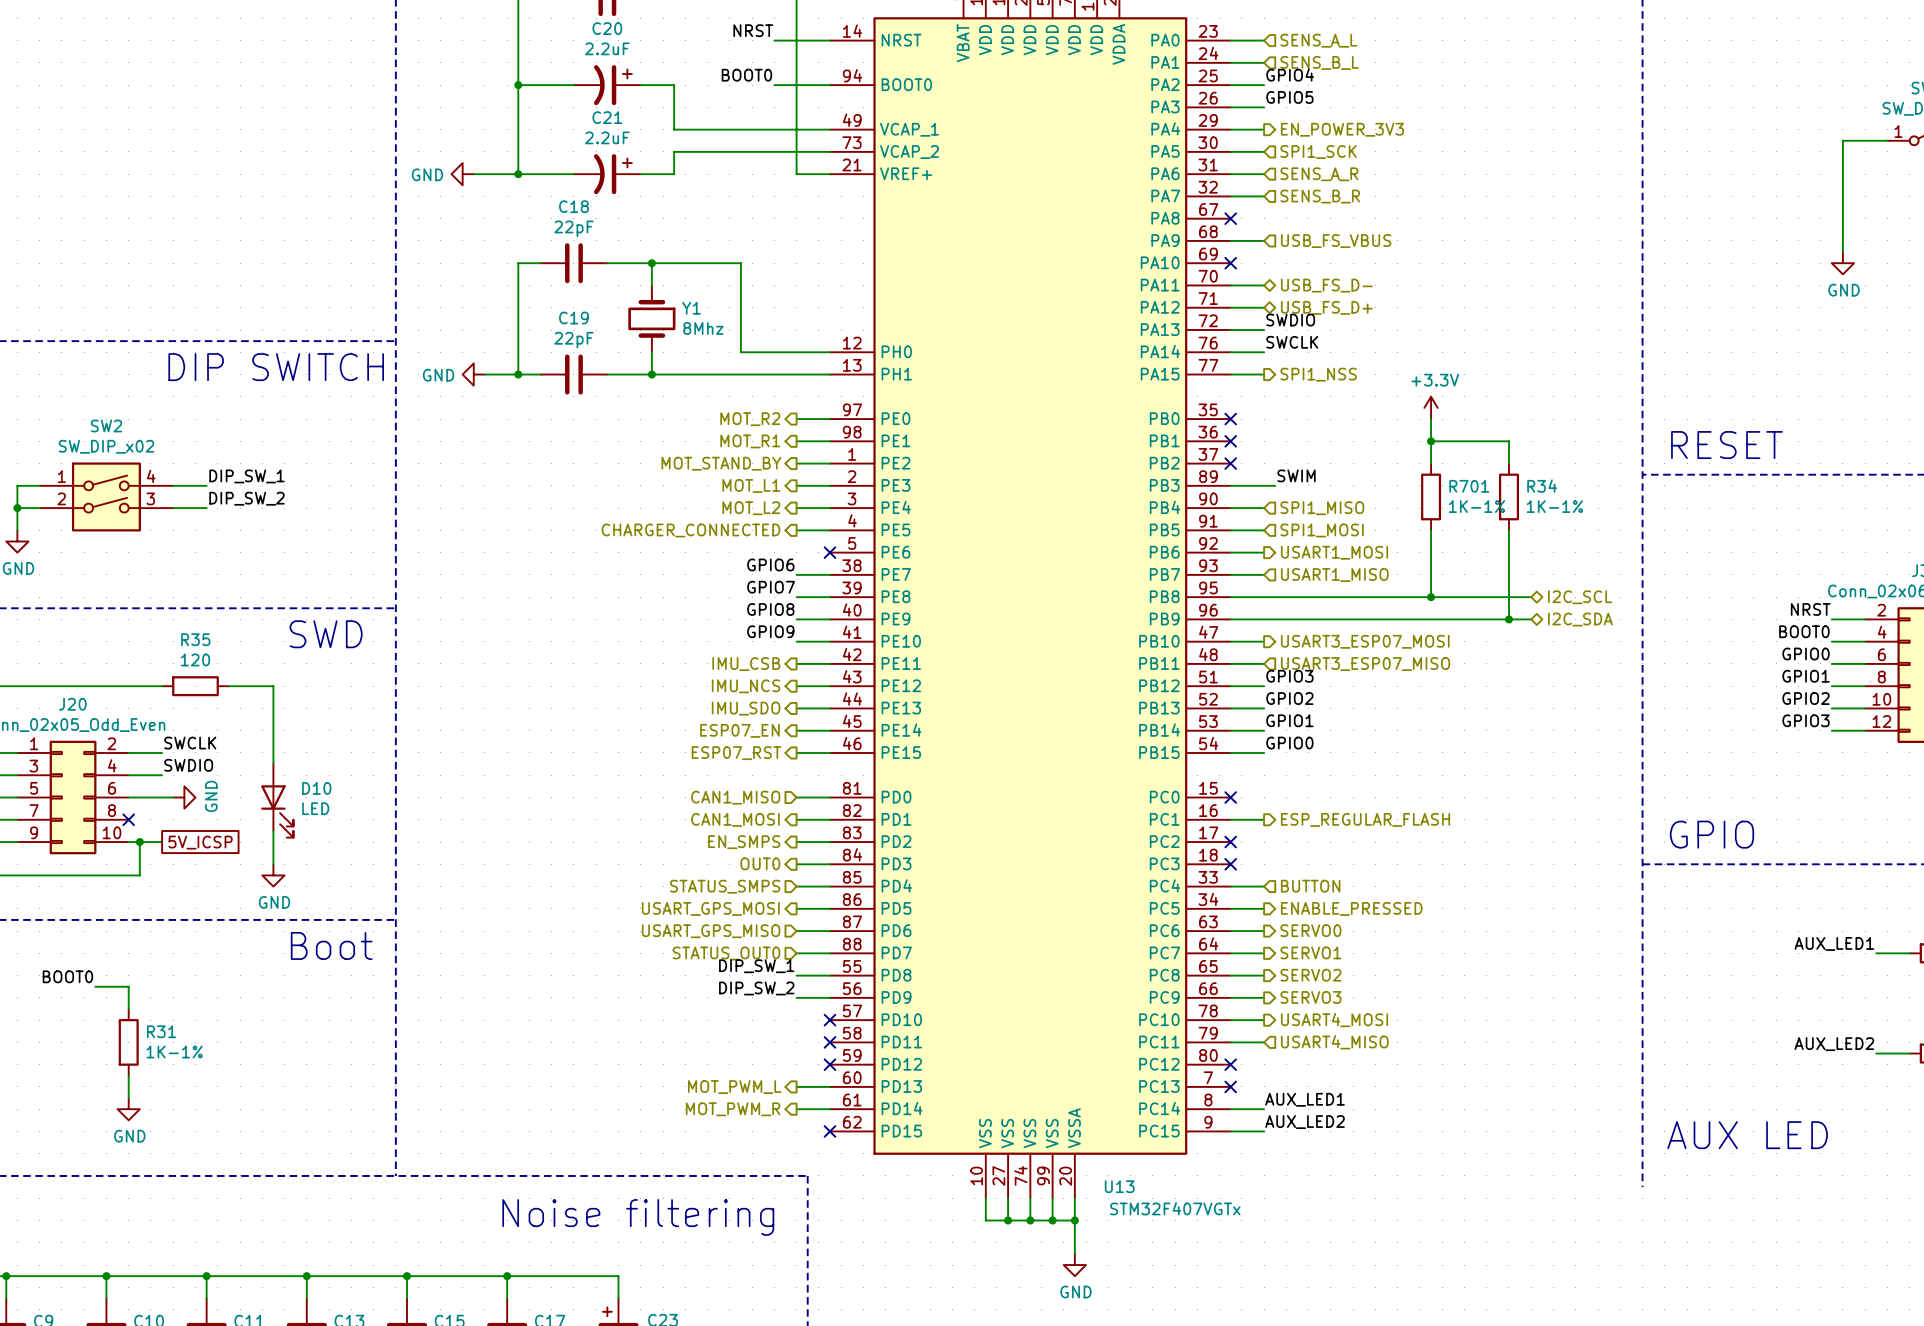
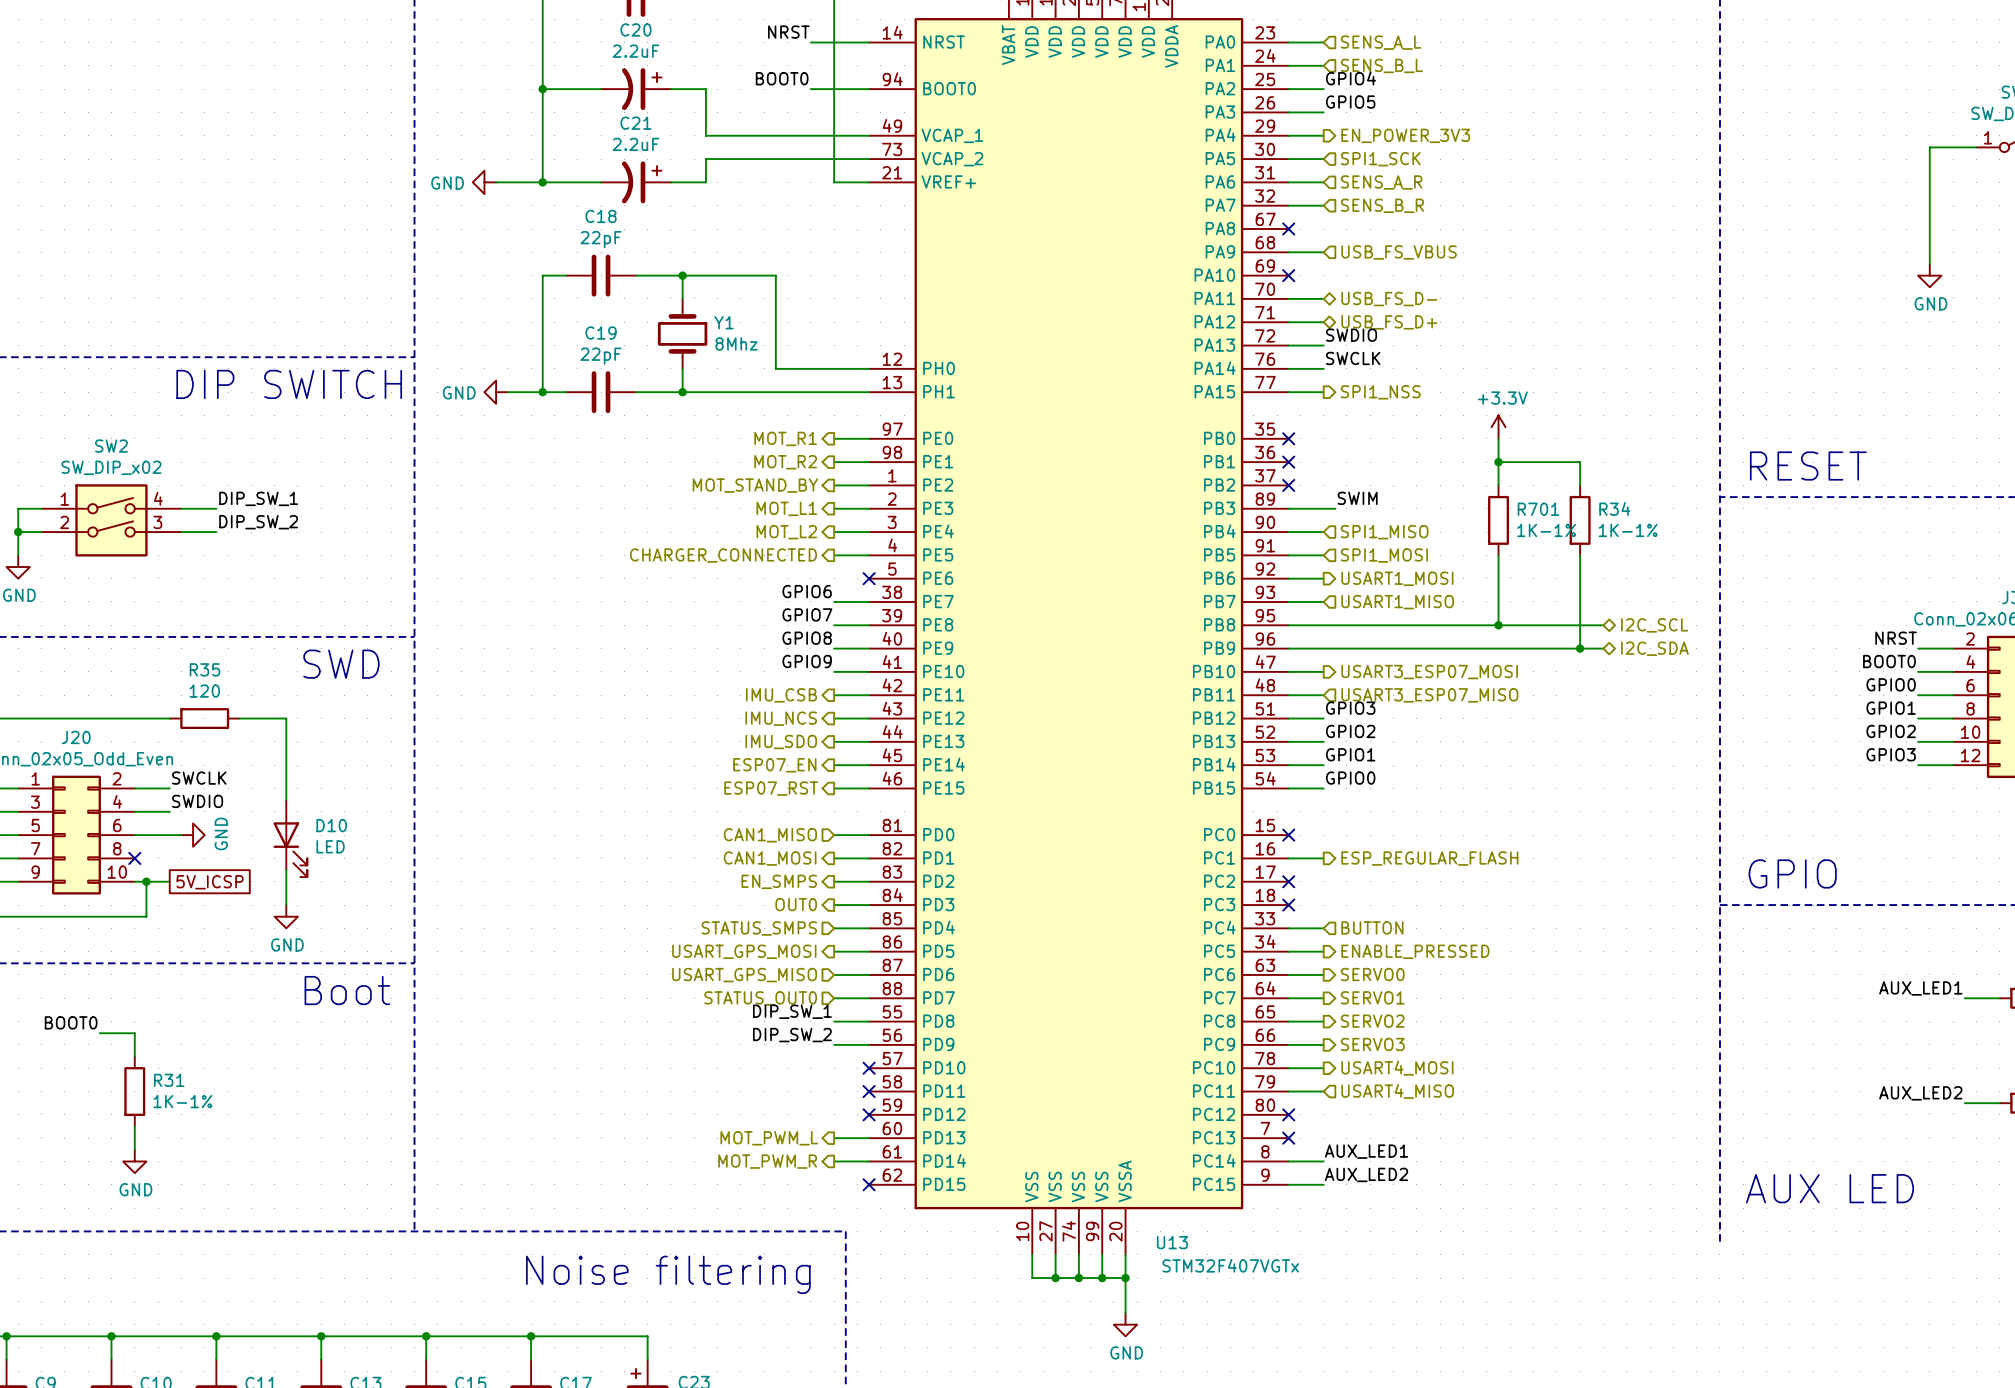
hierarchical label: MOT_R2 (750, 419) -> MOT_R1 (785, 438)
hierarchical label: MOT_R1 (750, 441) -> MOT_R2 (785, 462)

